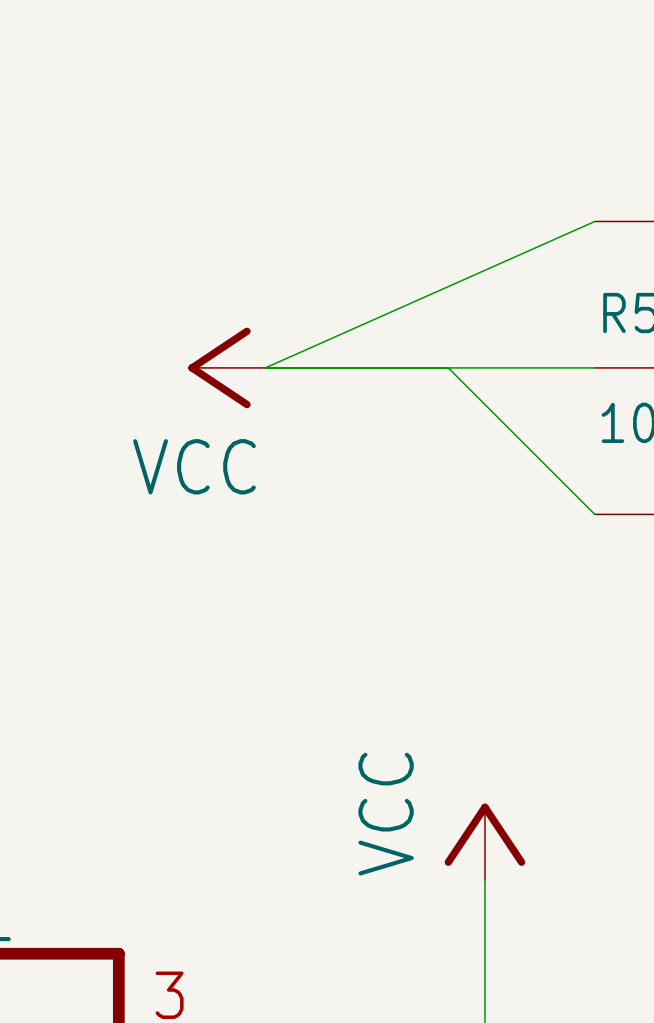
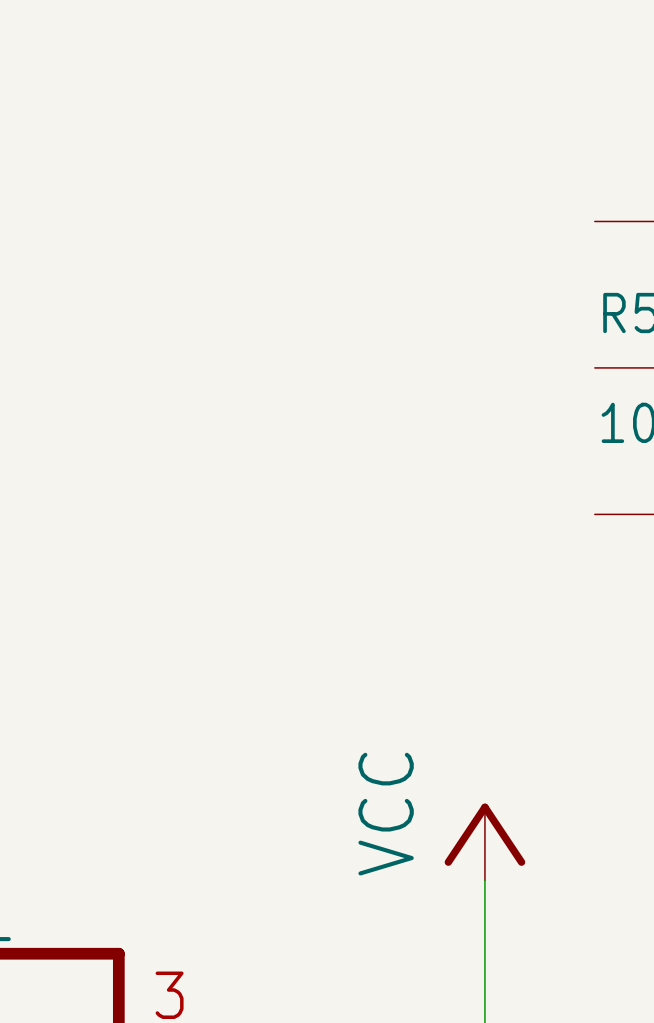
wire: (594, 221) (265, 367) (594, 367) -> none
power symbol: VCC (226, 367) -> none
wire: (448, 367) (594, 514) -> none

